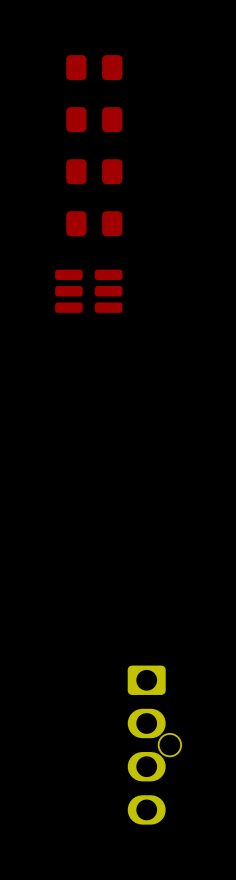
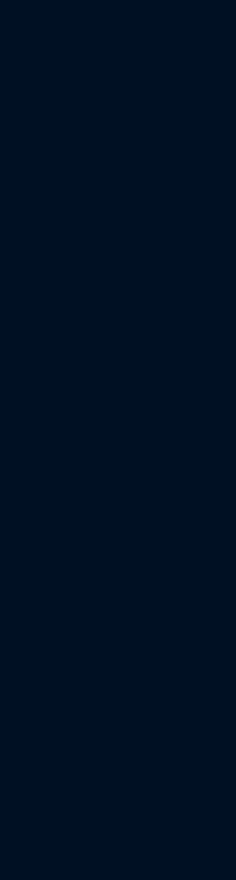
part: (94, 67) -> none
part: (94, 119) -> none
part: (94, 171) -> none
part: (94, 223) -> none
part: (88, 291) -> none
part: (154, 745) -> none

